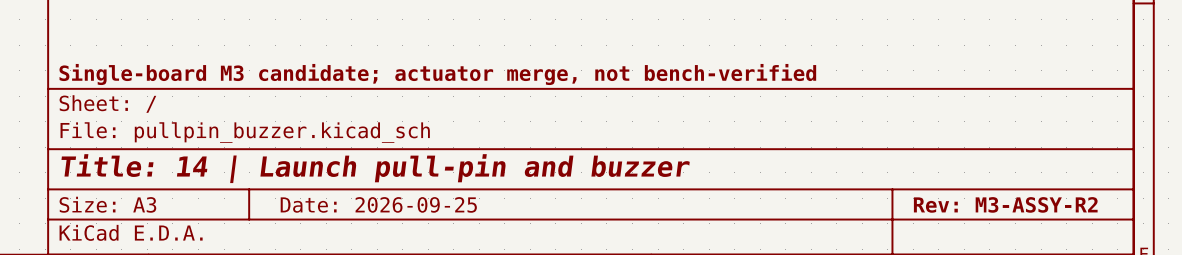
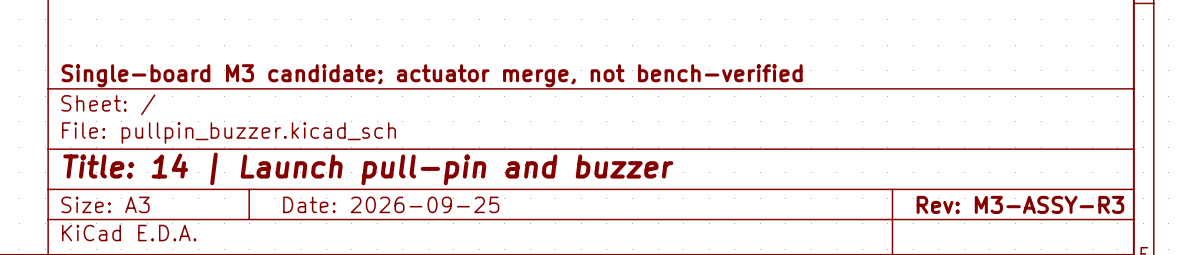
title block: Rev: M3-ASSY-R2 (1005, 204) -> Rev: M3-ASSY-R3 (1020, 204)

